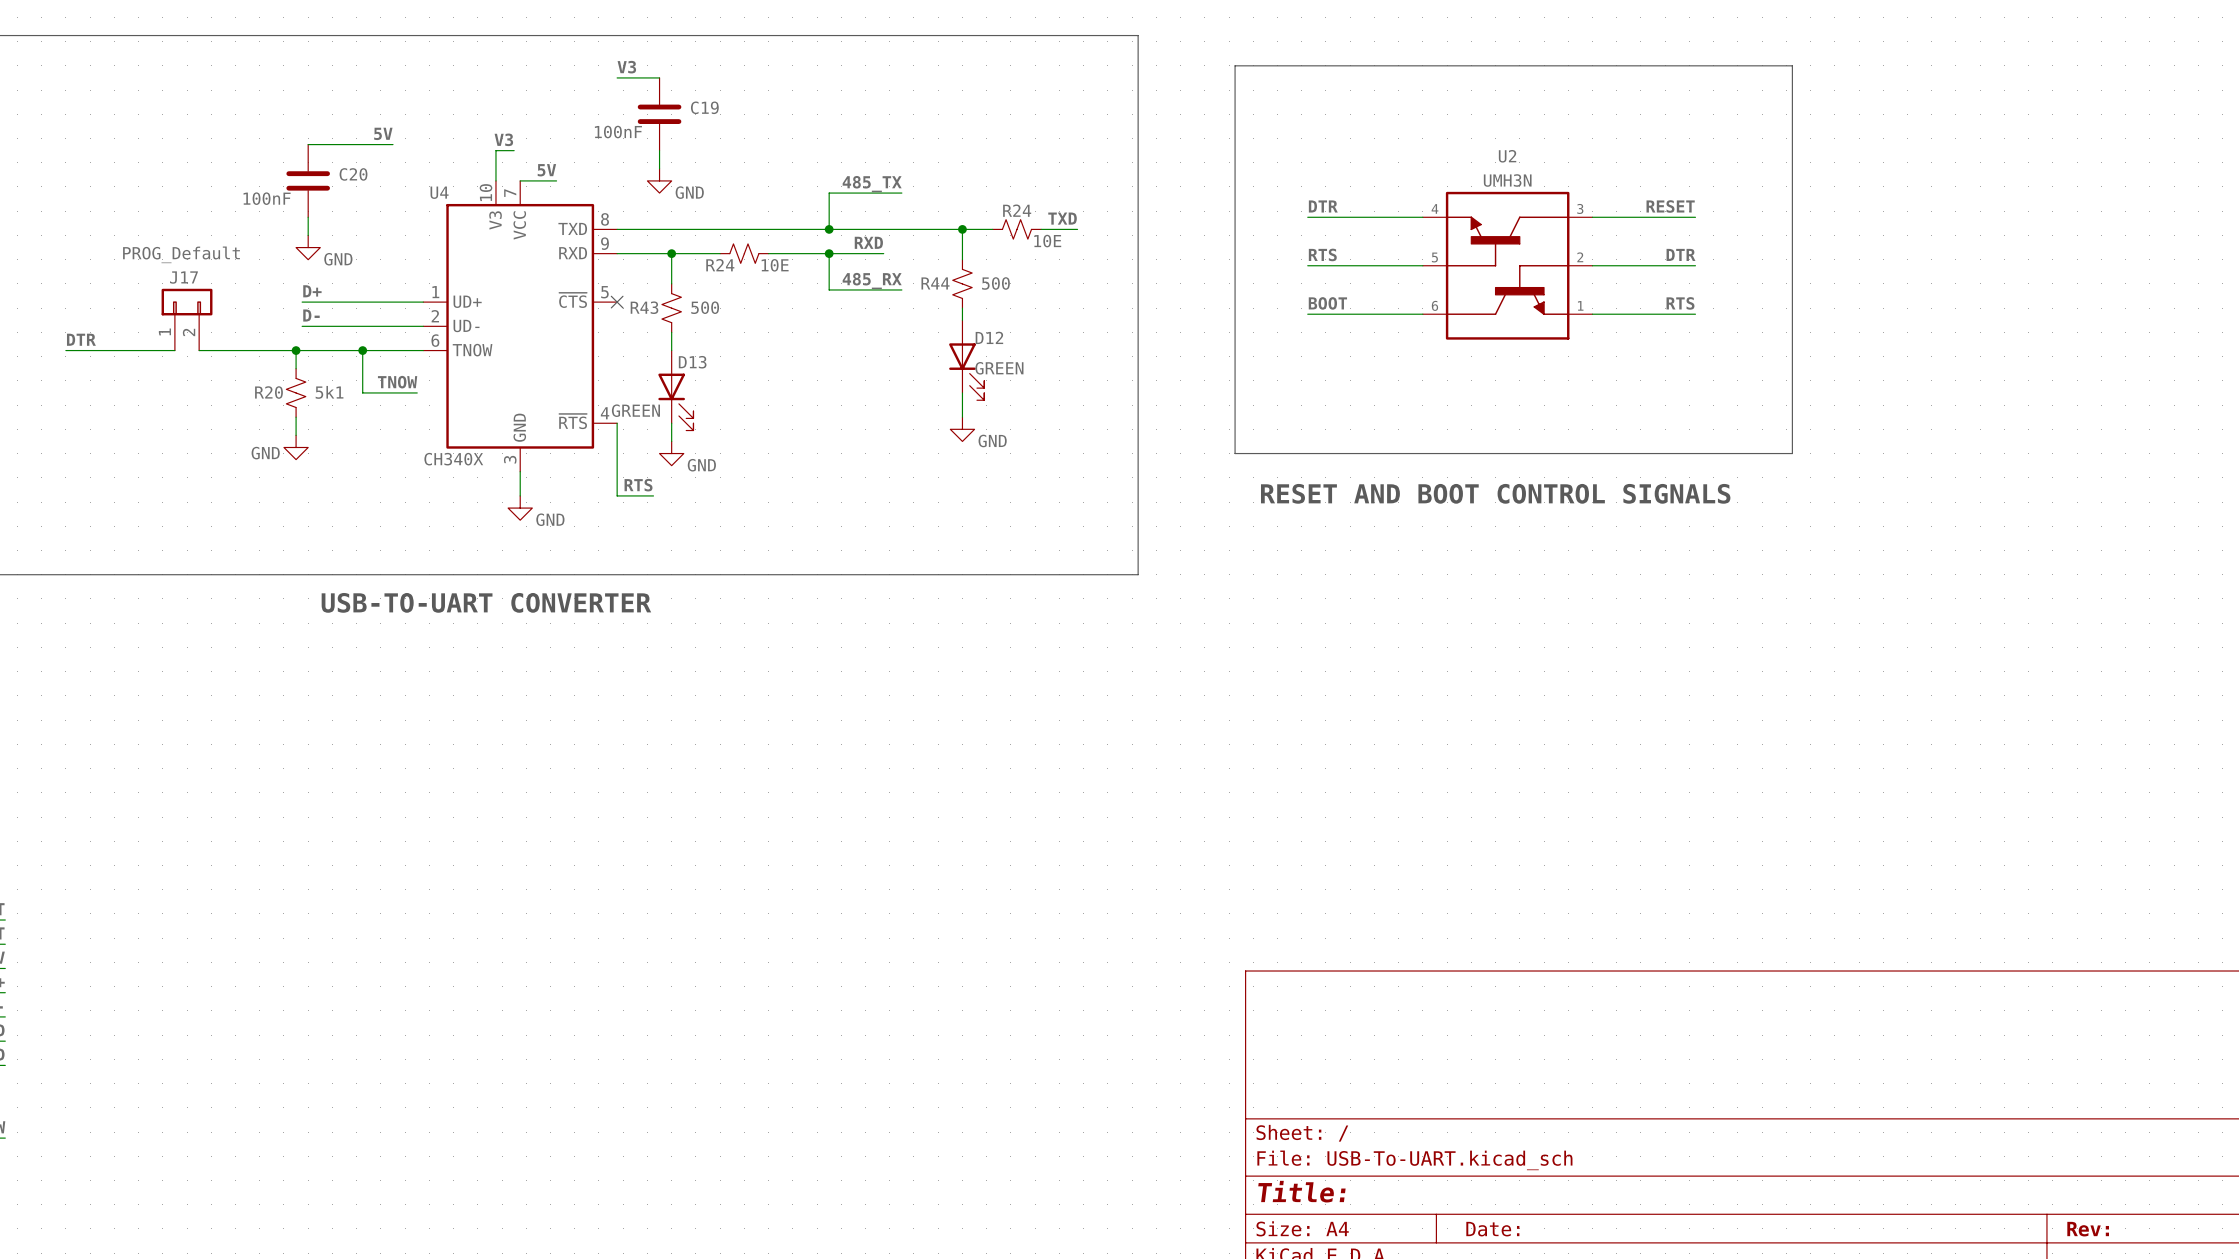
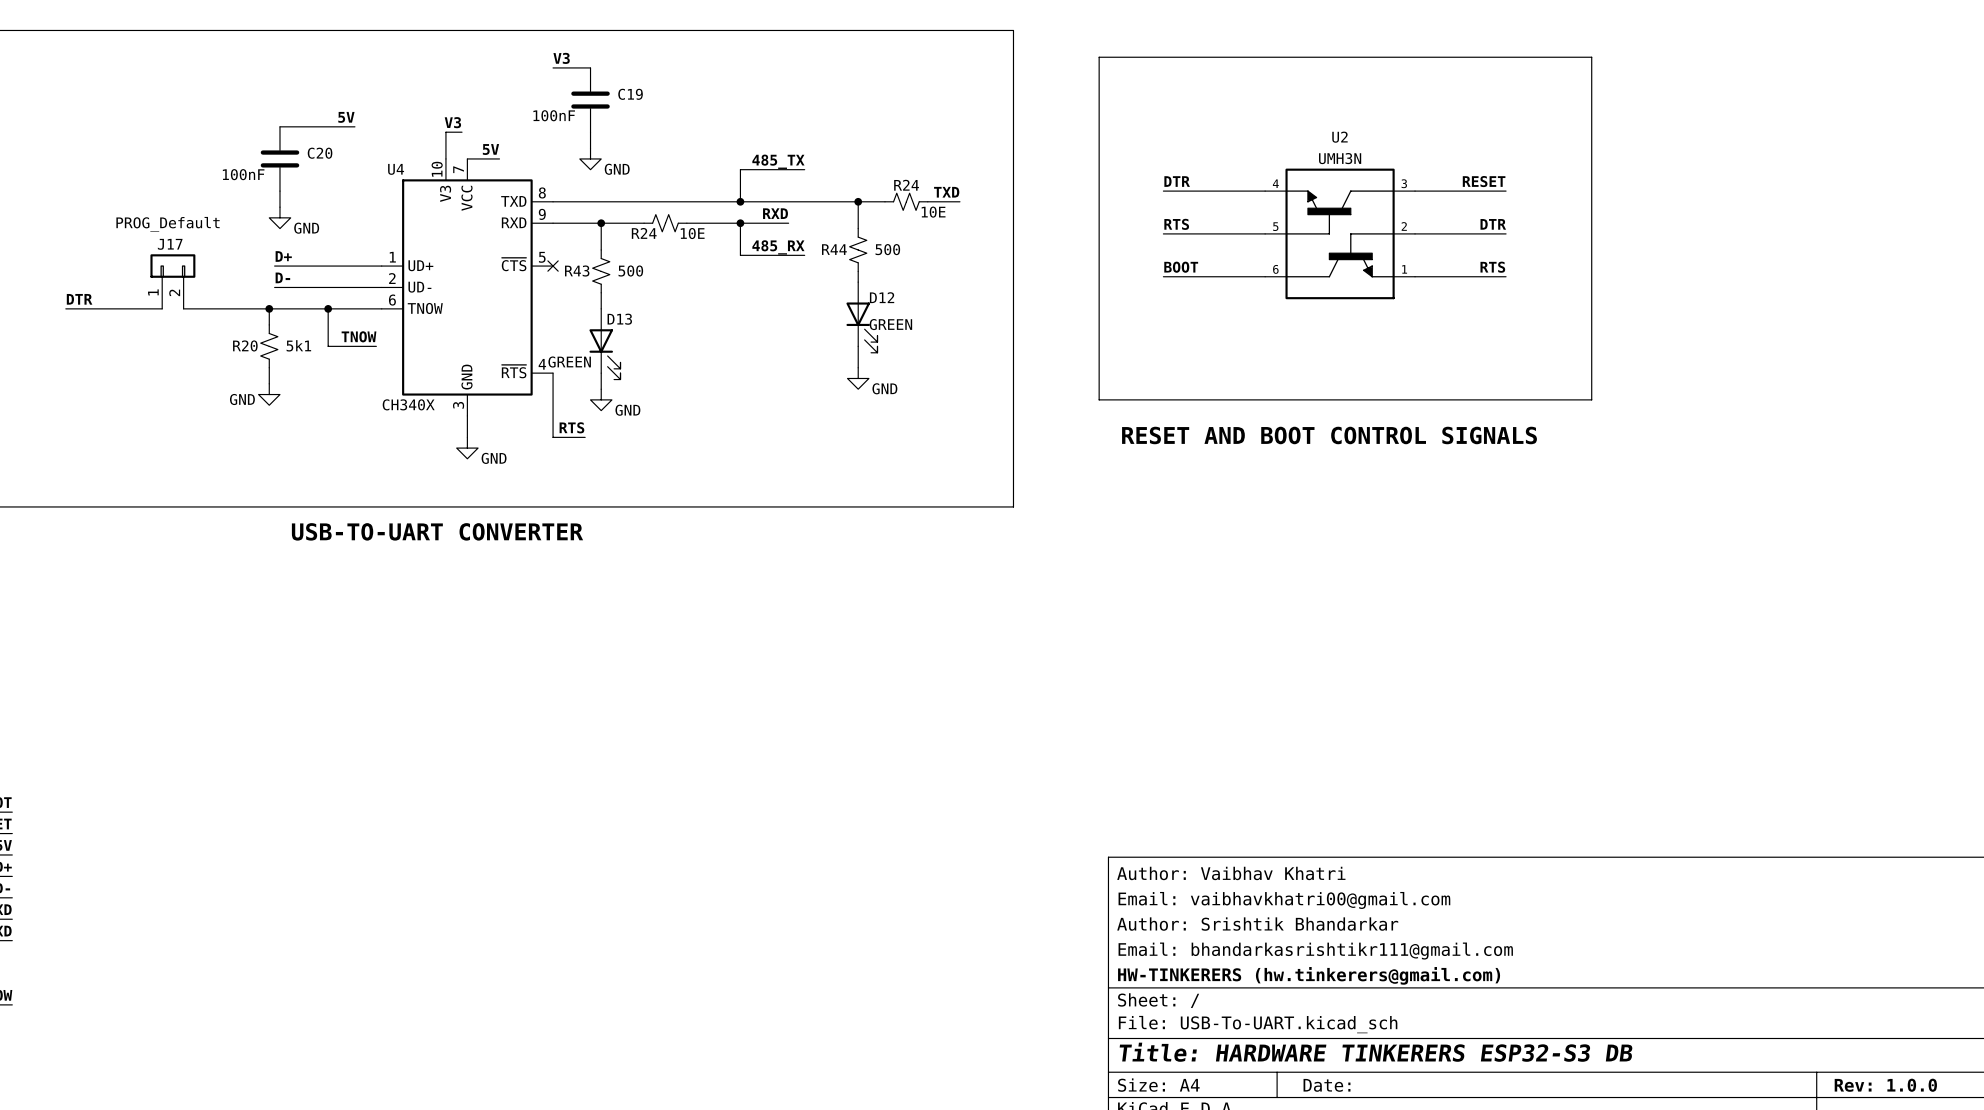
title block: none -> Author: Vaibhav Khatri (1231, 873)
title block: none -> Email: vaibhavkhatri00@gmail.com (1284, 900)
title block: none -> Author: Srishtik Bhandarkar (1257, 924)
title block: none -> Email: bhandarkasrishtikr111@gmail.com (1315, 951)
title block: none -> HW-TINKERERS (hw.tinkerers@gmail.com) (1309, 975)
title block: Title: (1301, 1191) -> Title: HARDWARE TINKERERS ESP32-S3 DB (1376, 1052)
title block: Rev: (2088, 1229) -> Rev: 1.0.0 (1885, 1085)

